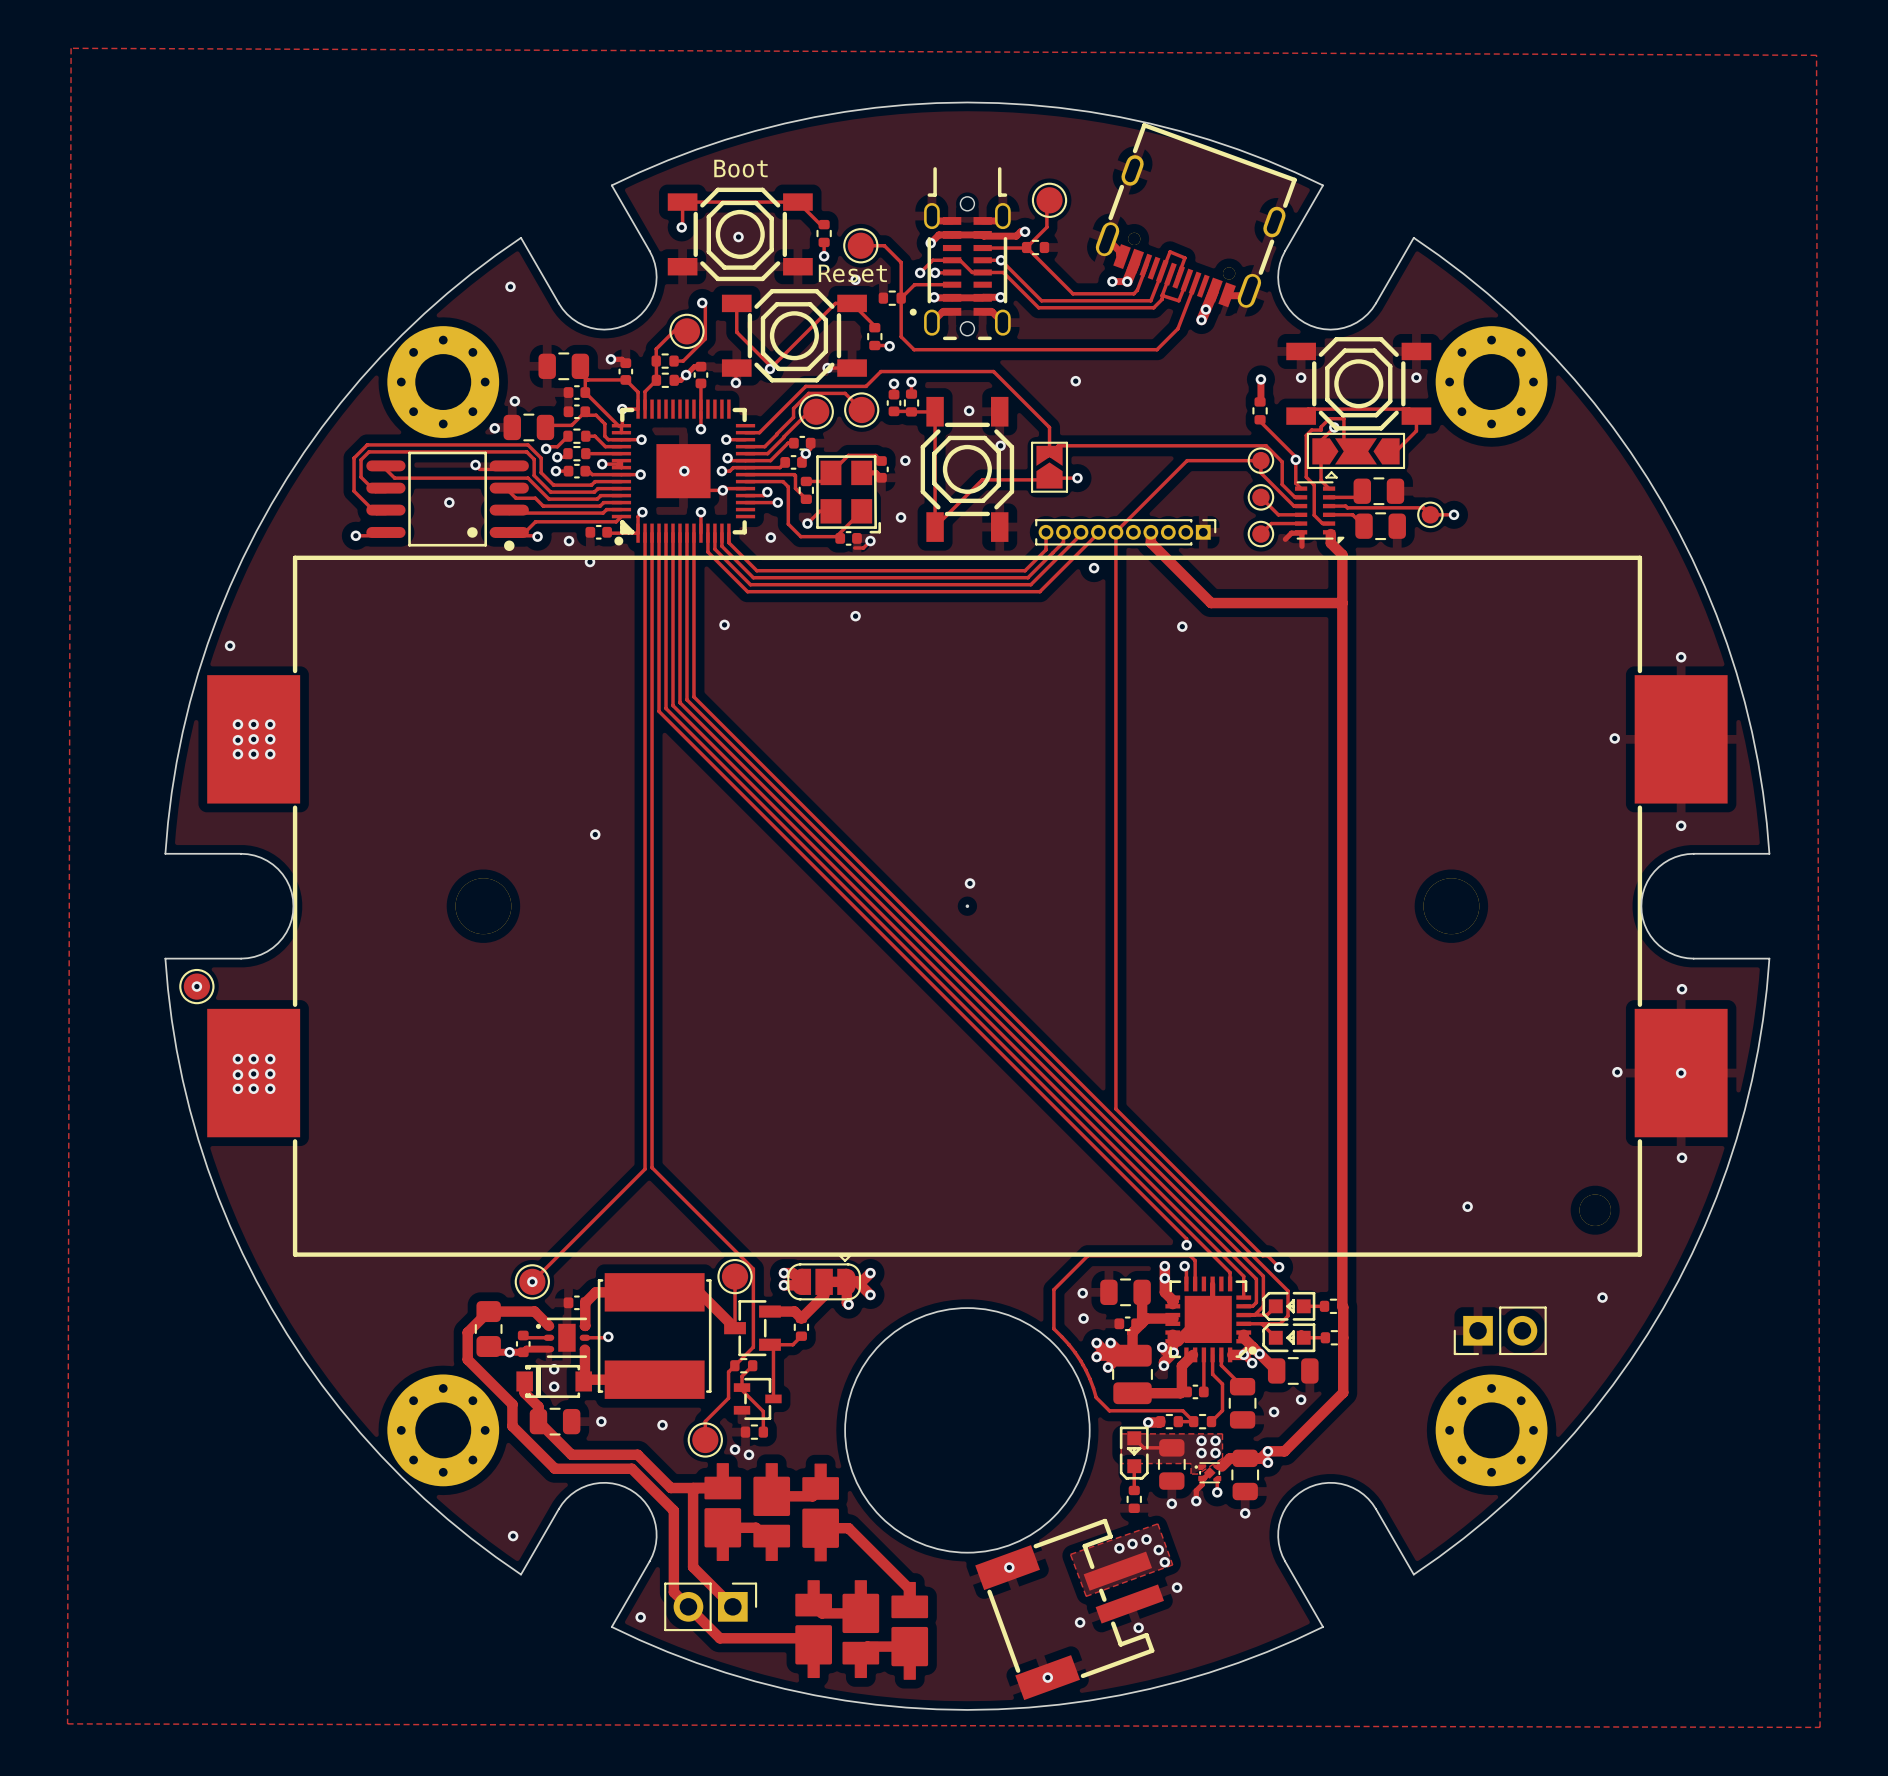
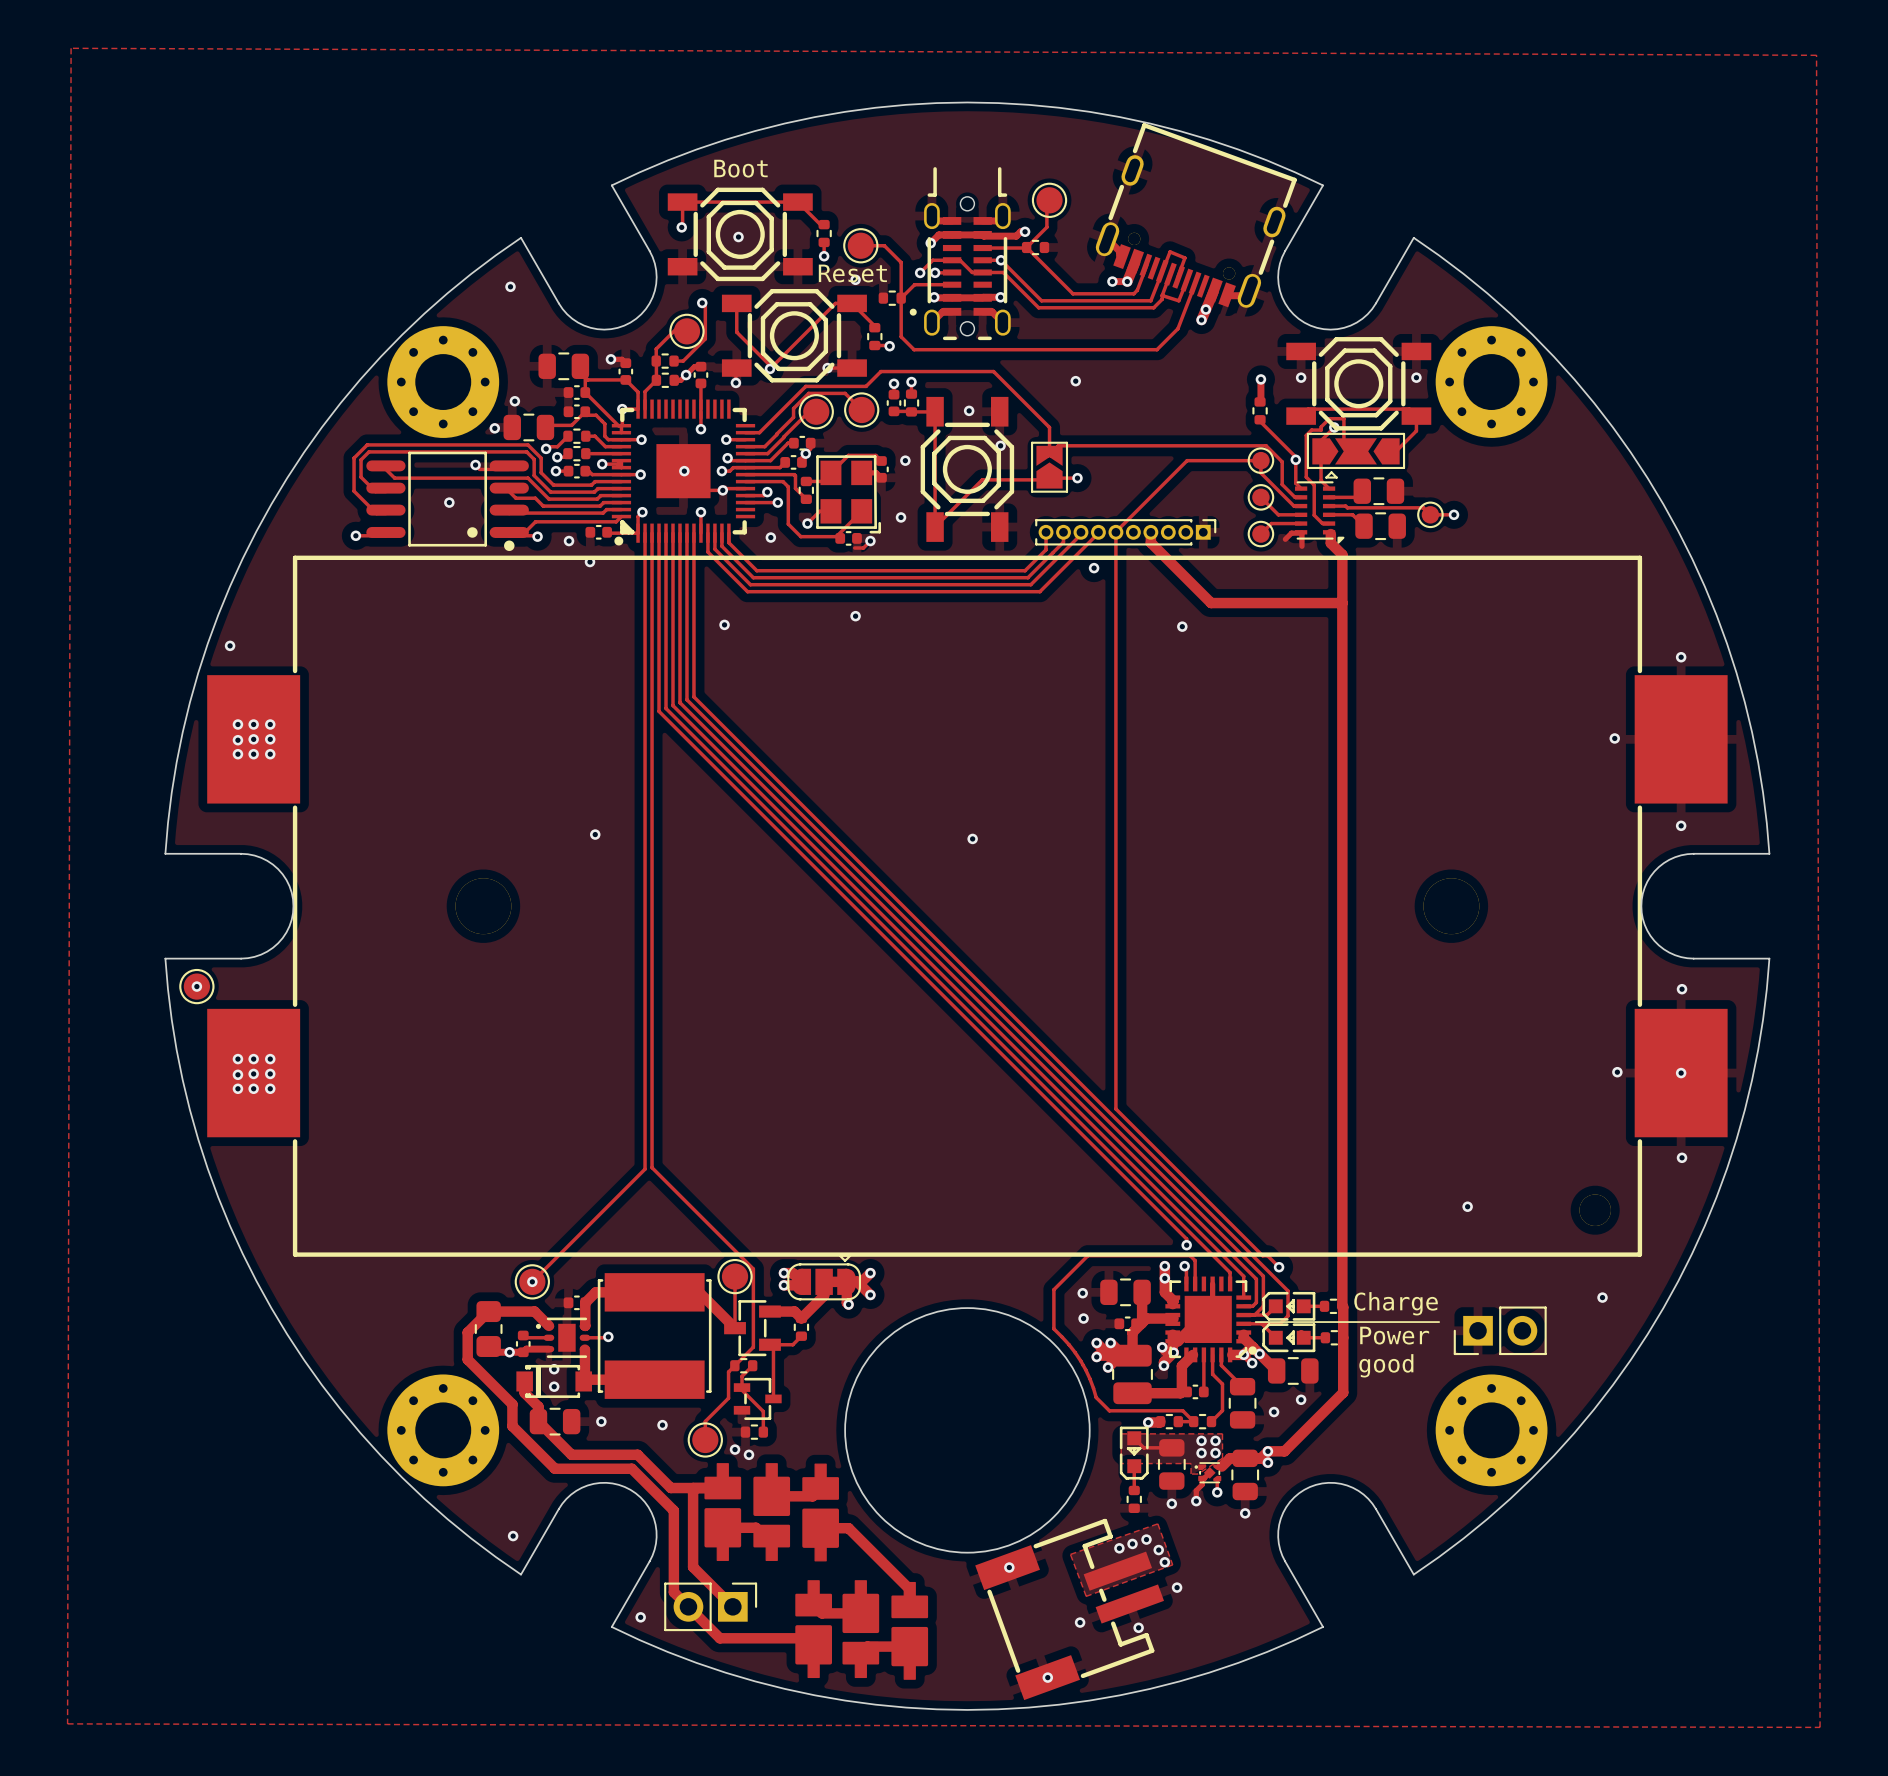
via position: (970, 883) -> (972, 838)
round board edge: [965, 904, 970, 908] -> none
text: none -> Charge (1396, 1303)
line: none -> (1255, 1322) (1439, 1322)
text: none -> Power (1394, 1335)
text: none -> good (1386, 1365)

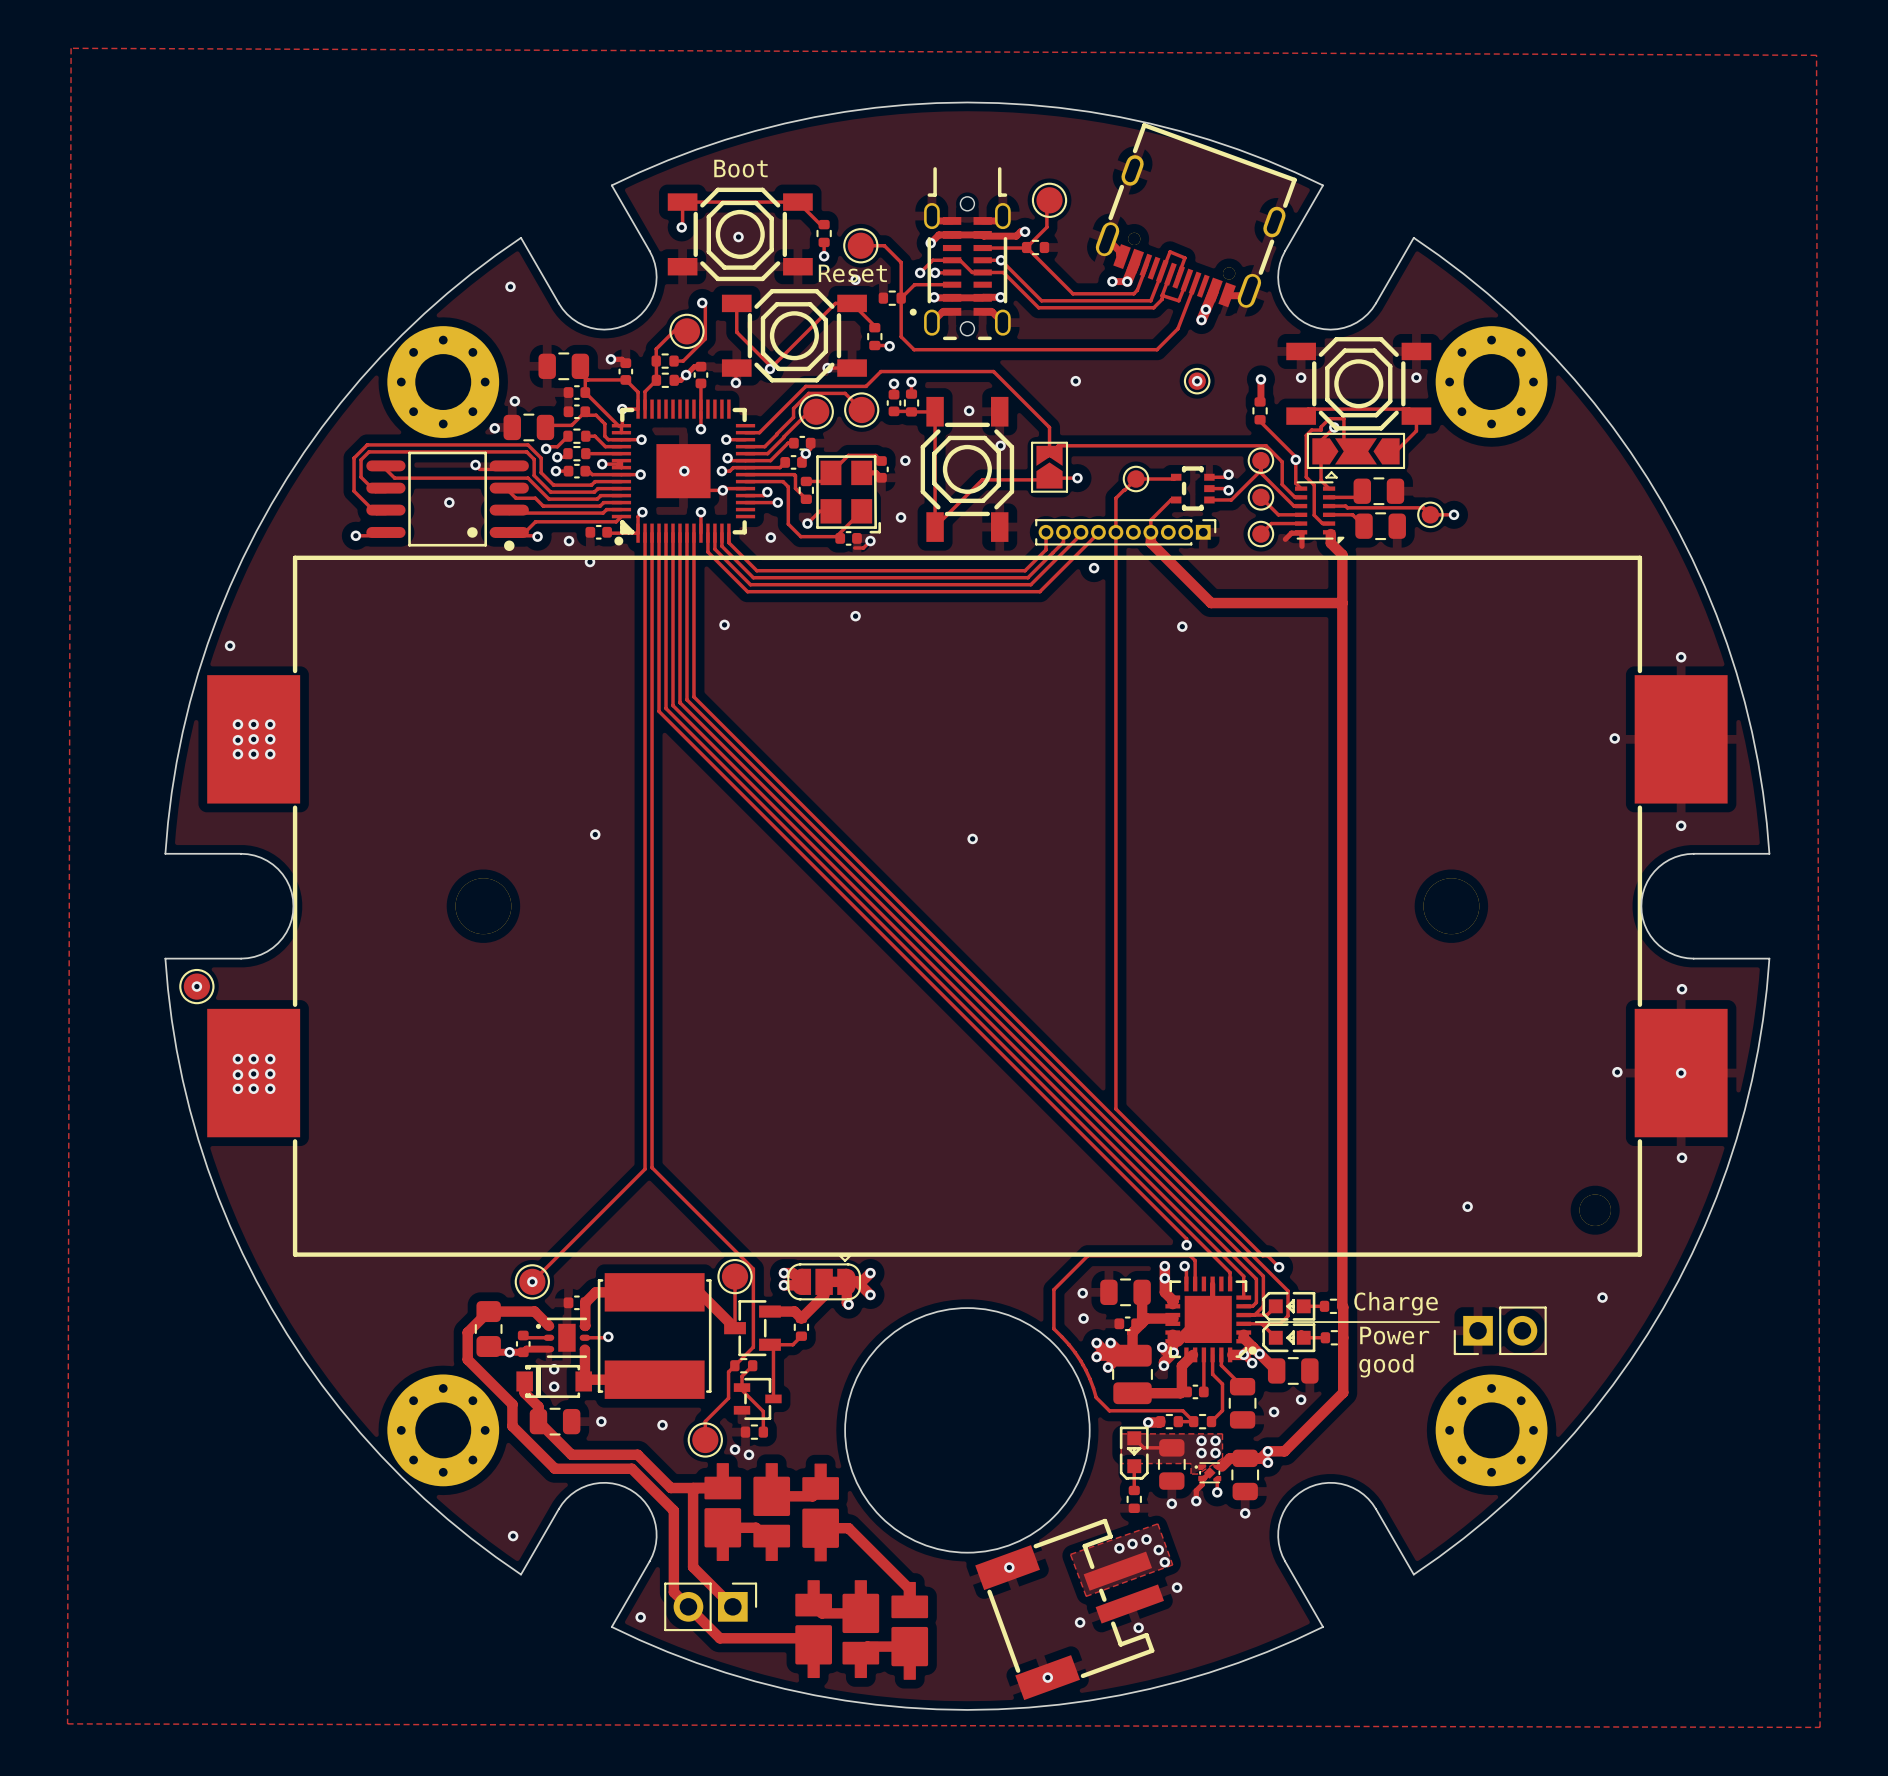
part: none -> (1197, 381)
via: none -> (1197, 381)
track: (1260, 460) (1187, 460) (1115, 531) -> (1176, 477) (1174, 479) (1136, 479) (1115, 498) (1115, 531)
track: none -> (1260, 470) (1231, 499) (1209, 499)
track: none -> (1228, 474) (1225, 477) (1209, 477)
via: none -> (1228, 474)
part: none -> (1136, 479)
part: none -> (1192, 488)
track: none -> (1209, 488) (1226, 488) (1228, 490)
via: none -> (1228, 490)
track: none -> (1176, 499) (1170, 499) (1150, 520) (1150, 532)

